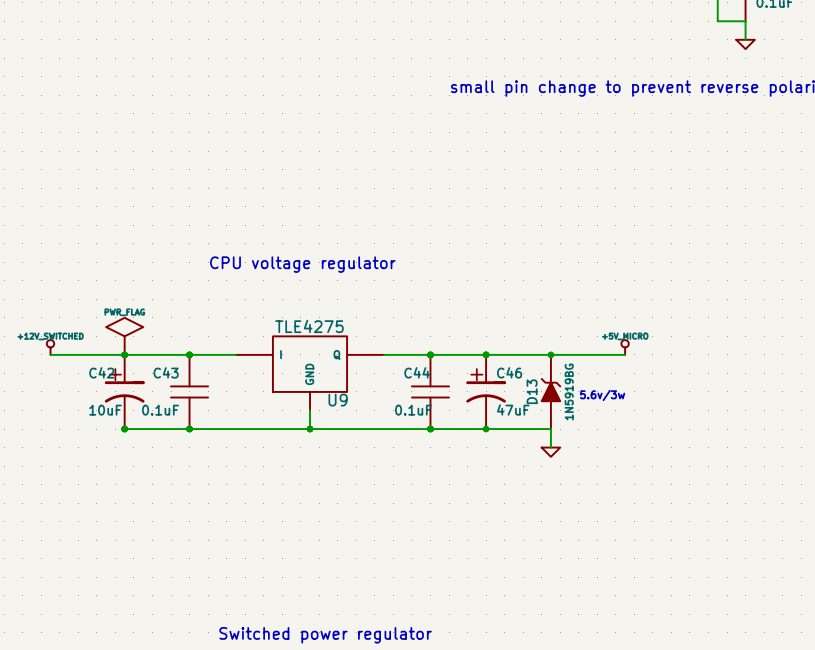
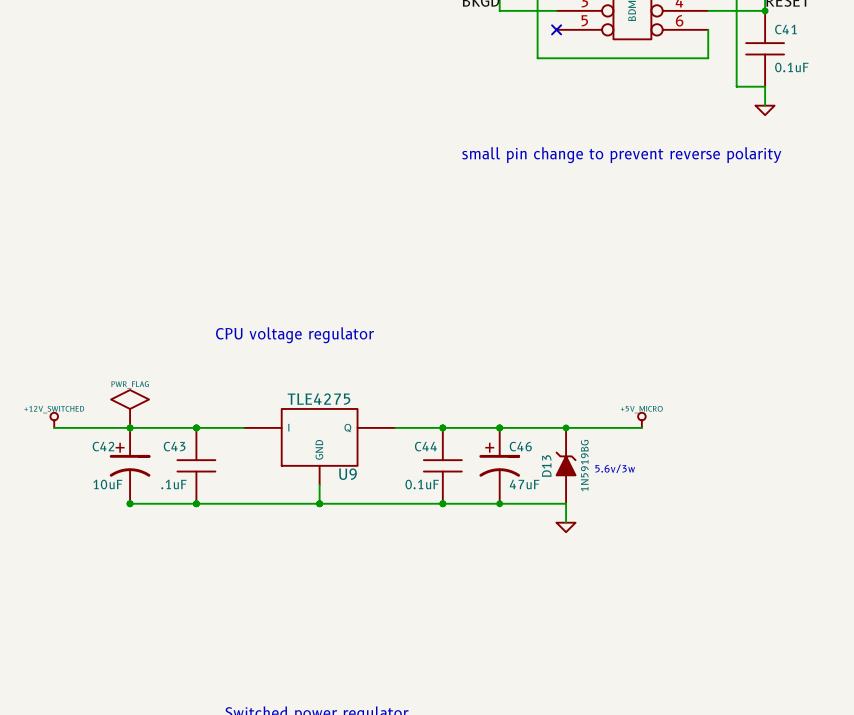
C43 value: 0.1uF (160, 410) -> .1uF (173, 484)

